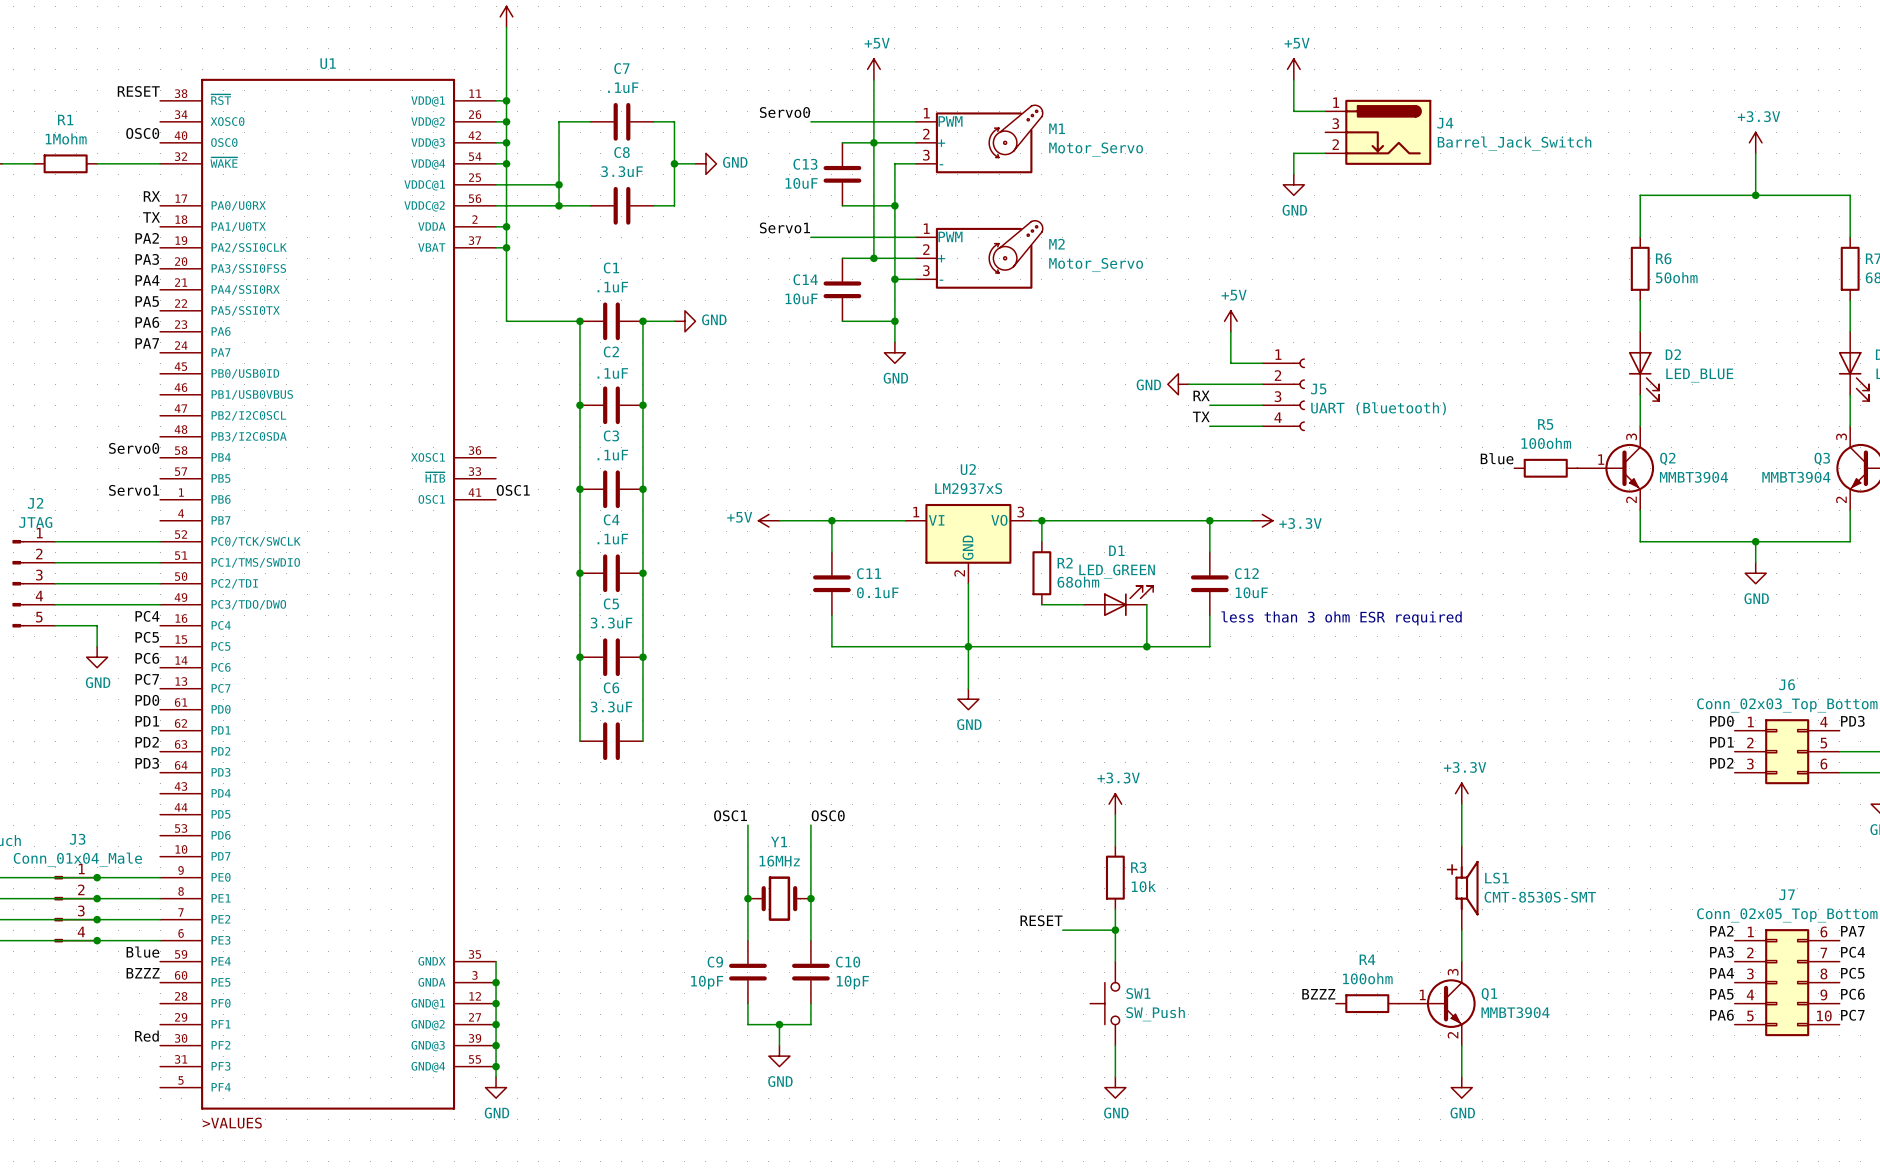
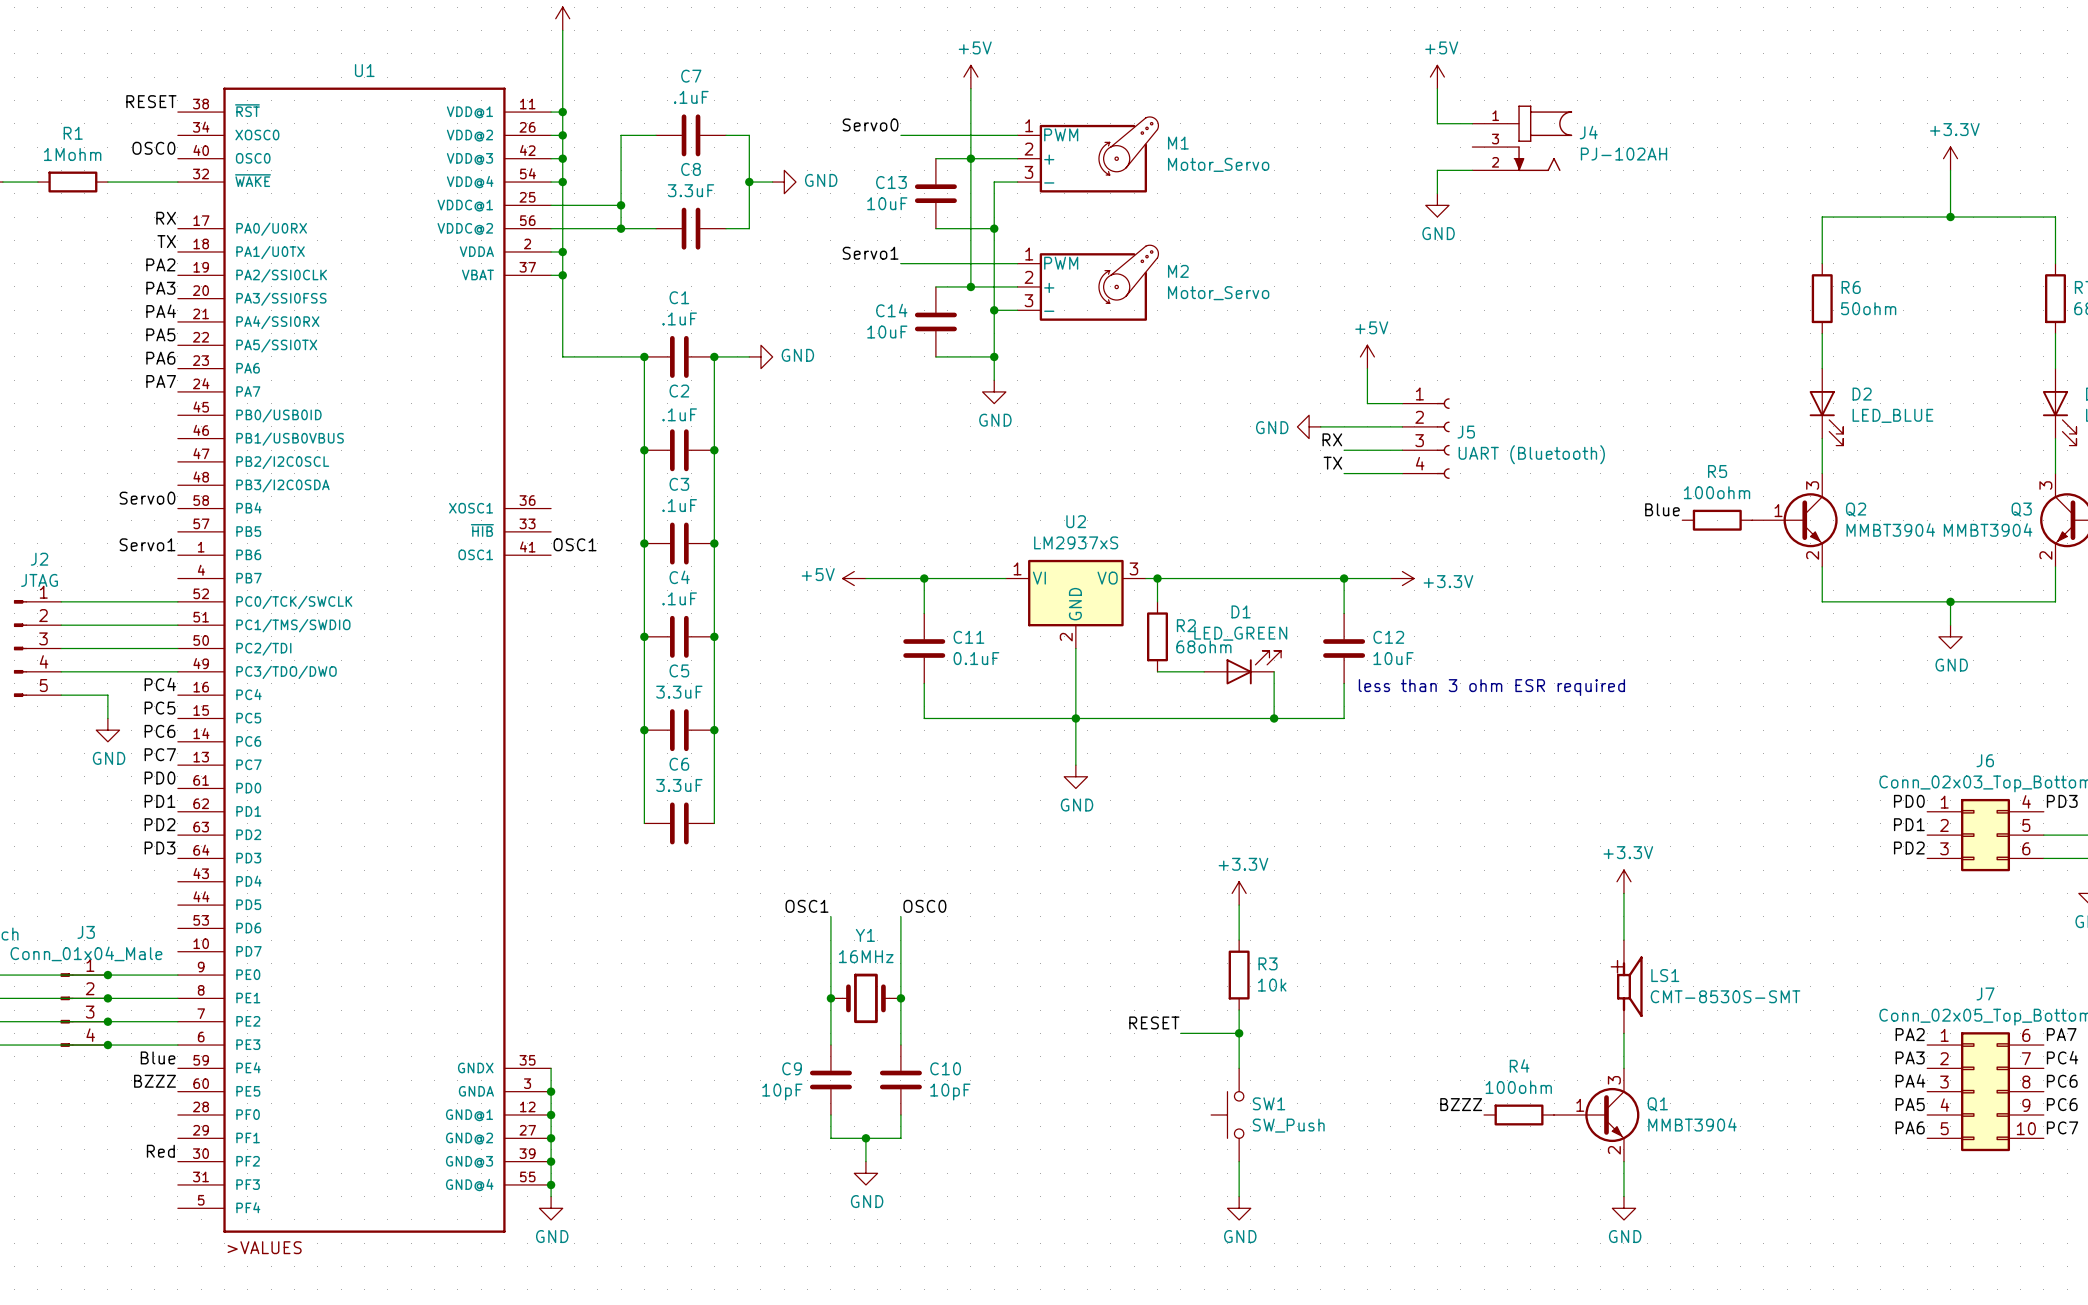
J4 symbol: [1325, 99, 1432, 165] -> [1472, 105, 1573, 172]
J4 value: Barrel_Jack_Switch (1514, 143) -> PJ-102AH (1623, 154)
label: PC5 (1852, 973) -> PC6 (2062, 1081)

